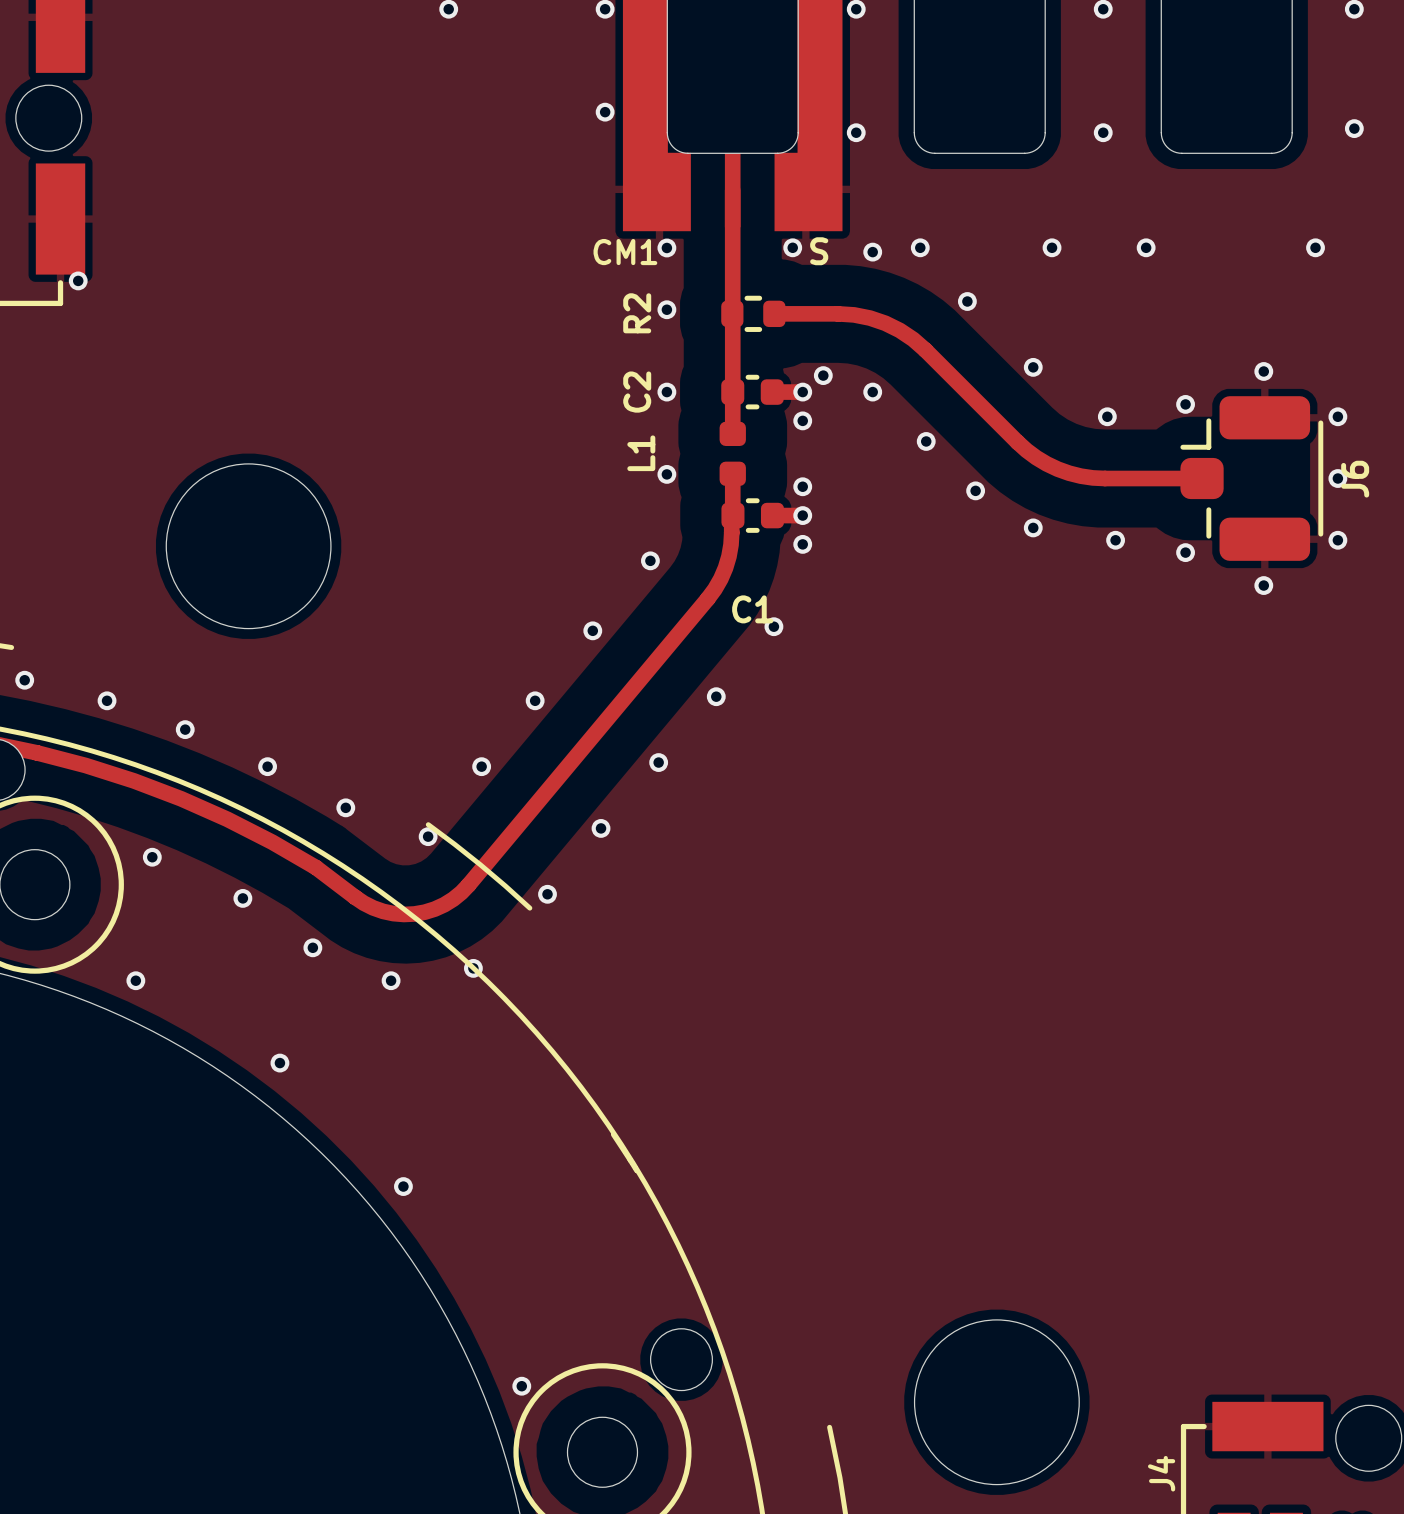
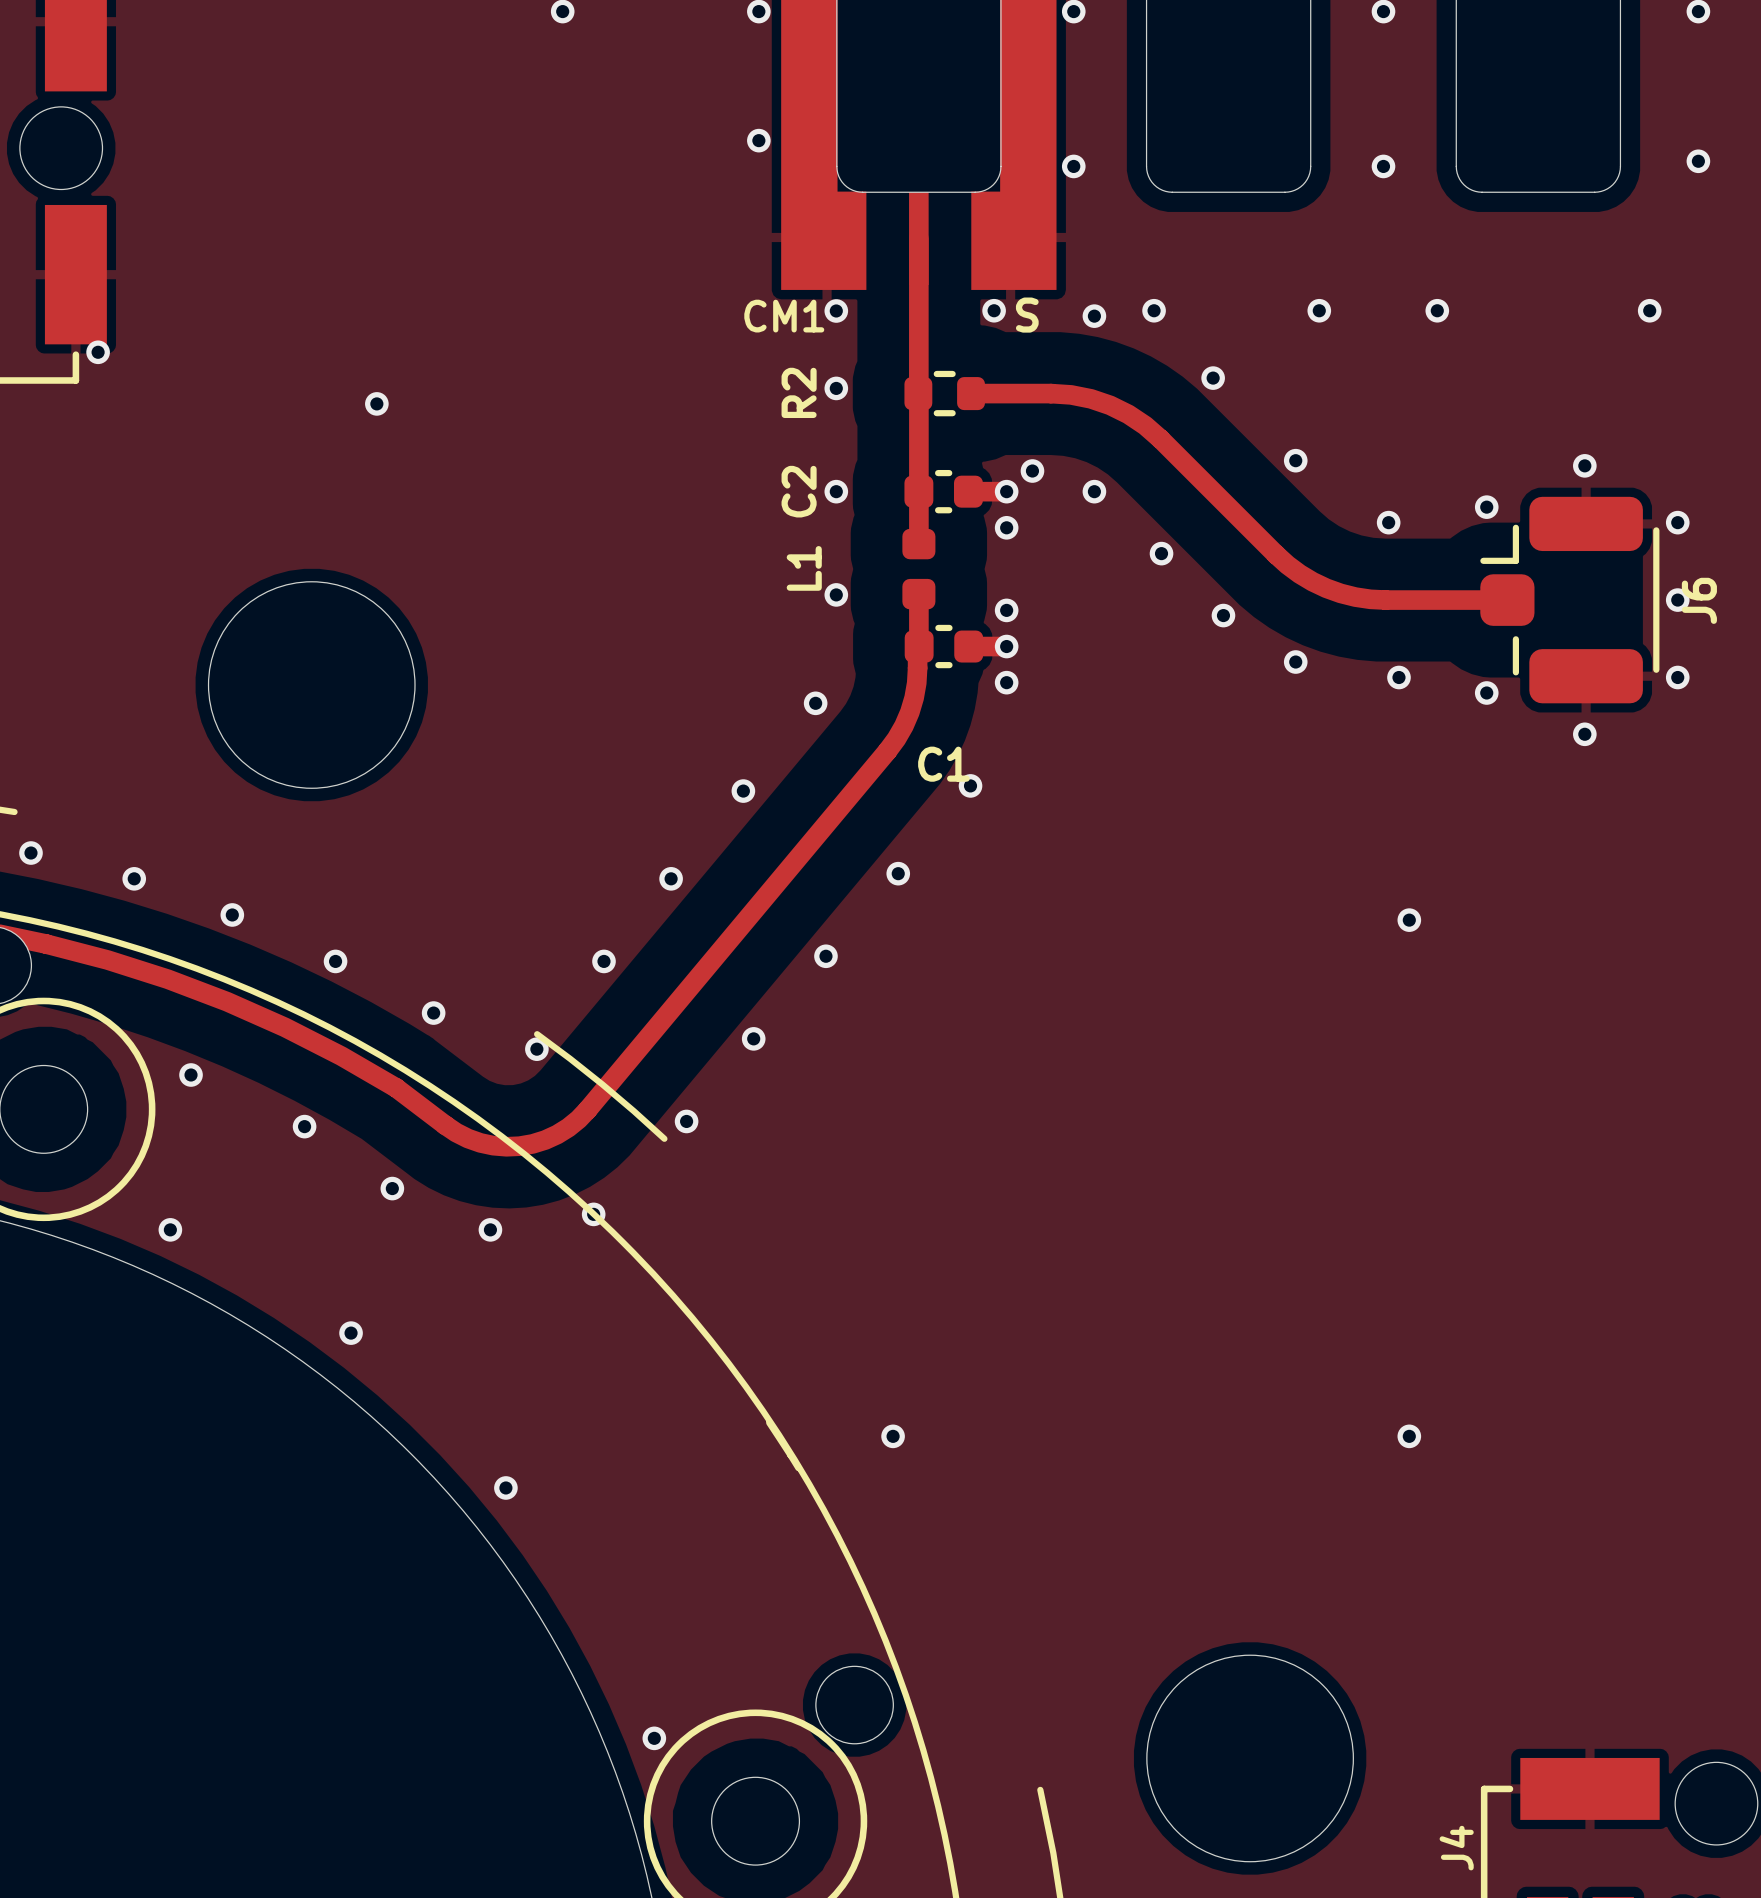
via: none -> (376, 403)
via: none -> (1409, 920)
via: none -> (893, 1436)
via: none -> (1409, 1436)

